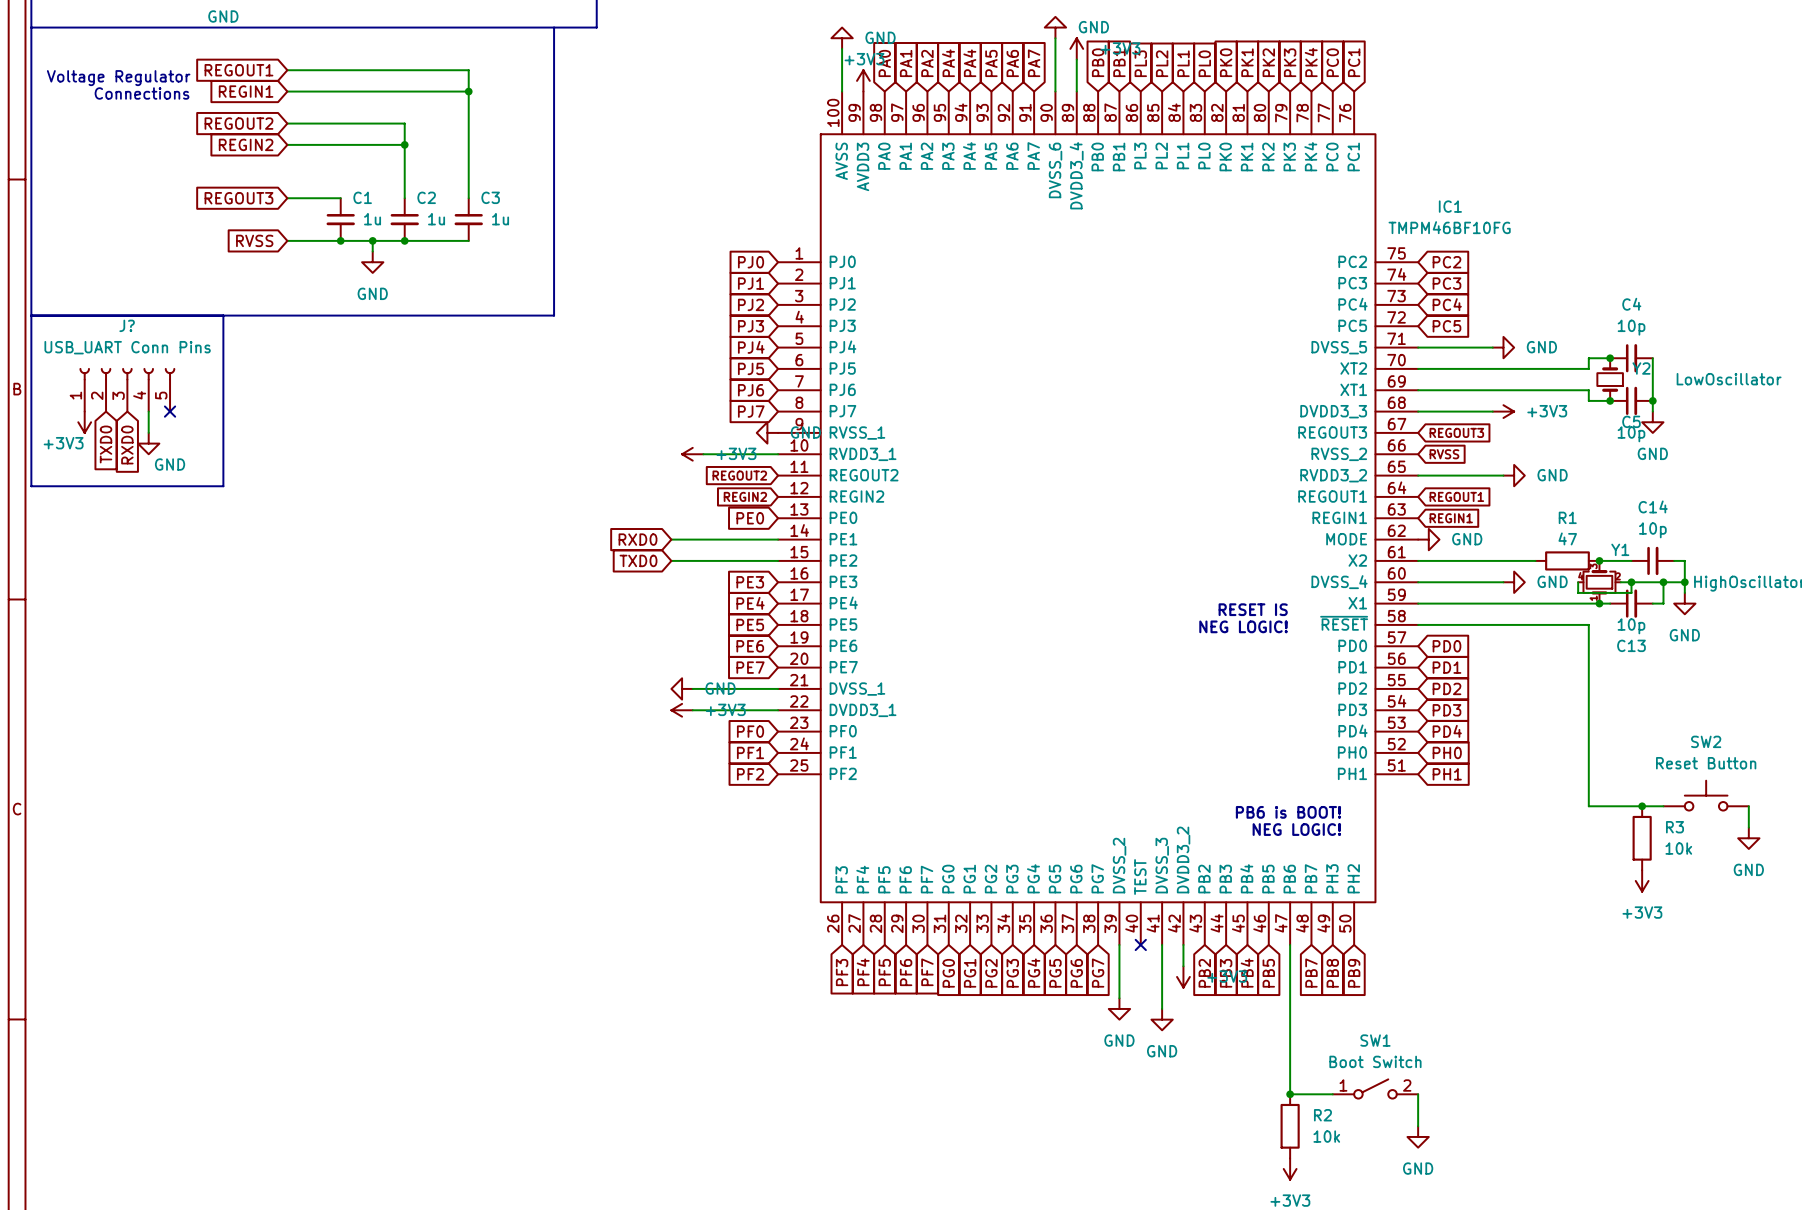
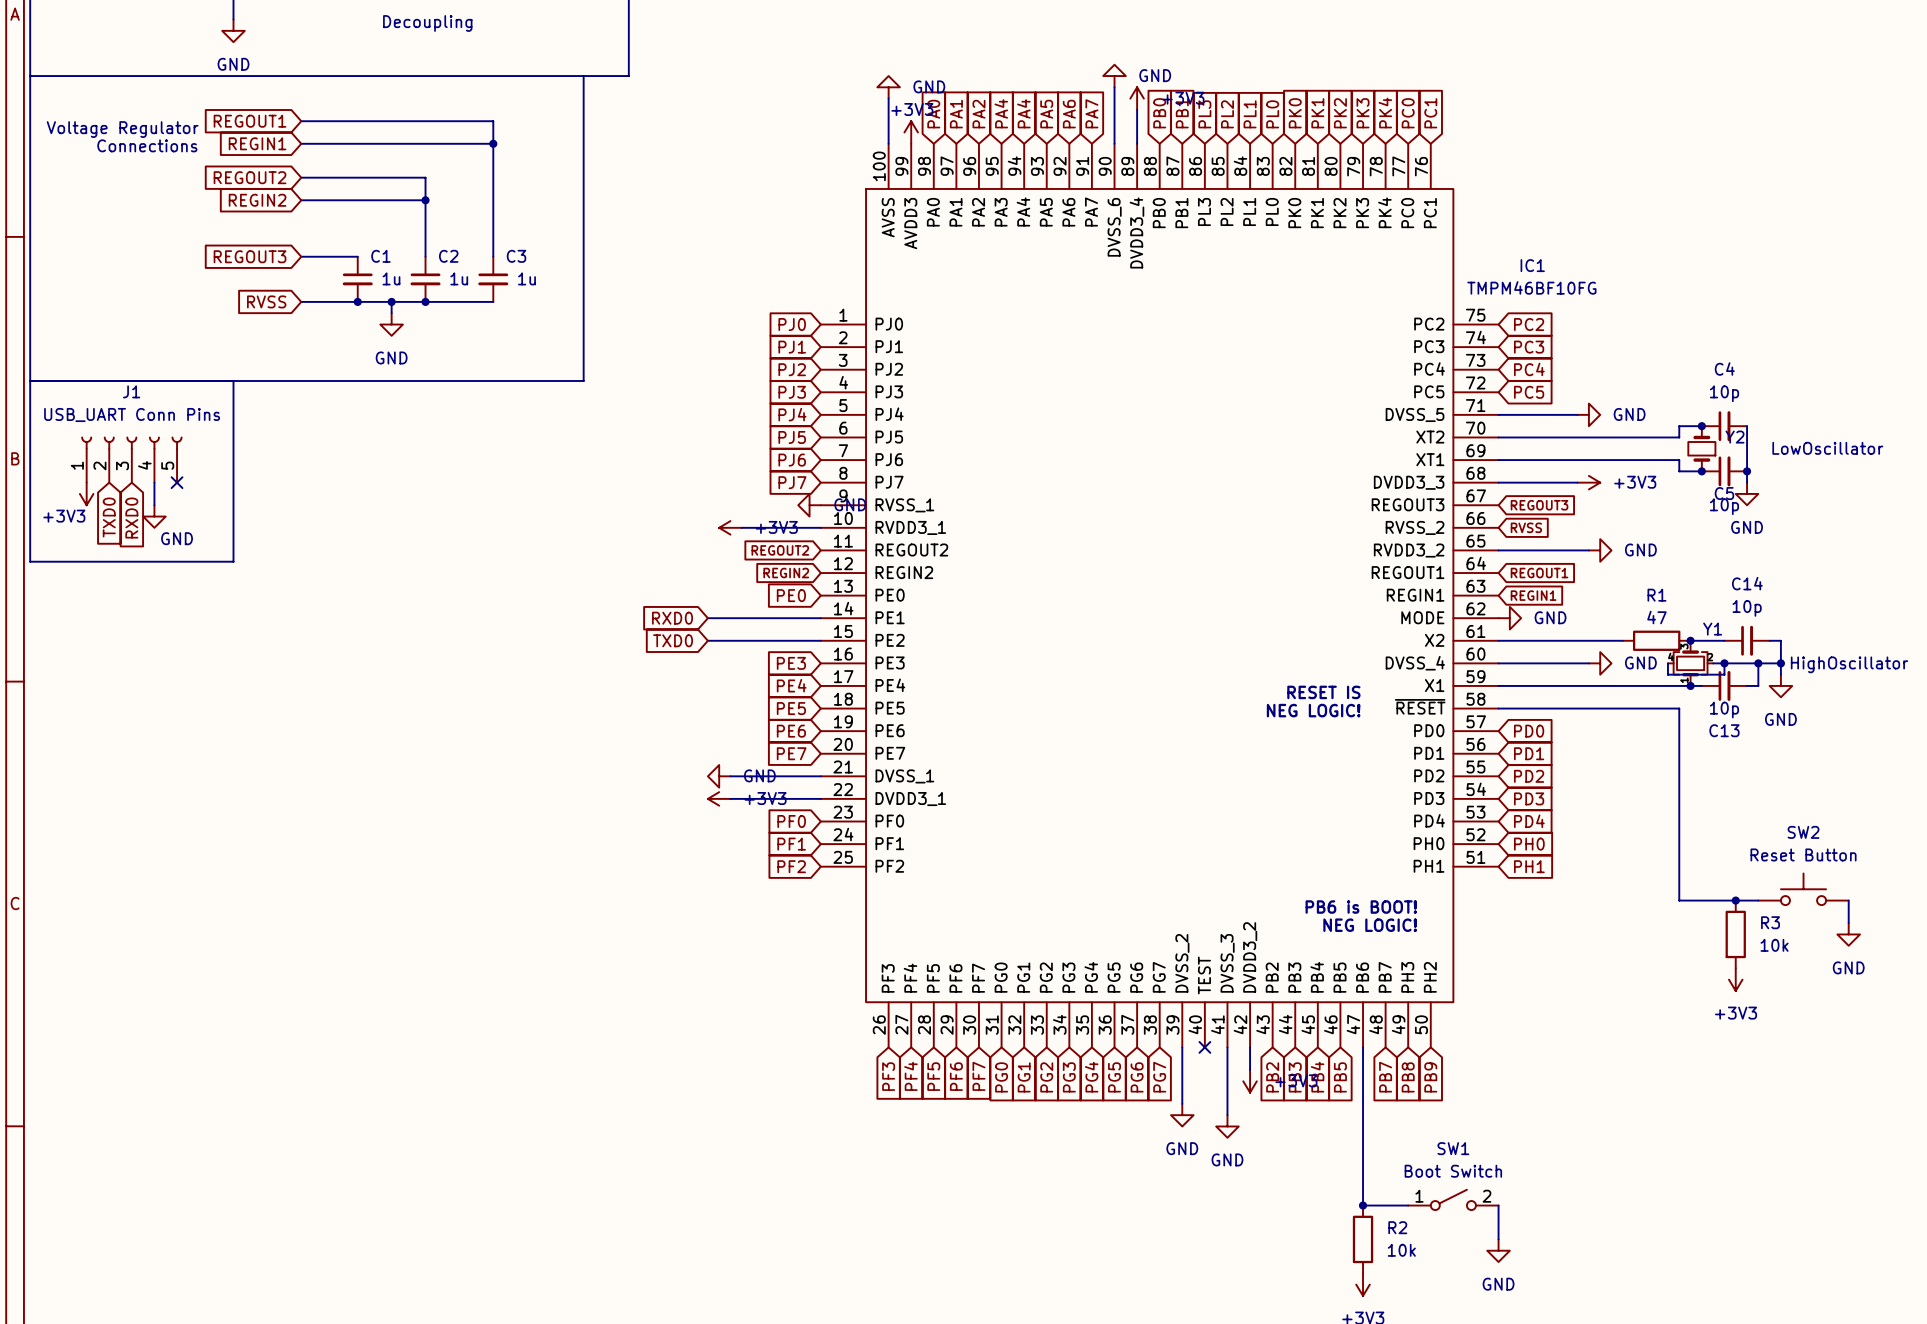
J? name: J? (127, 325) -> J1 (131, 391)

